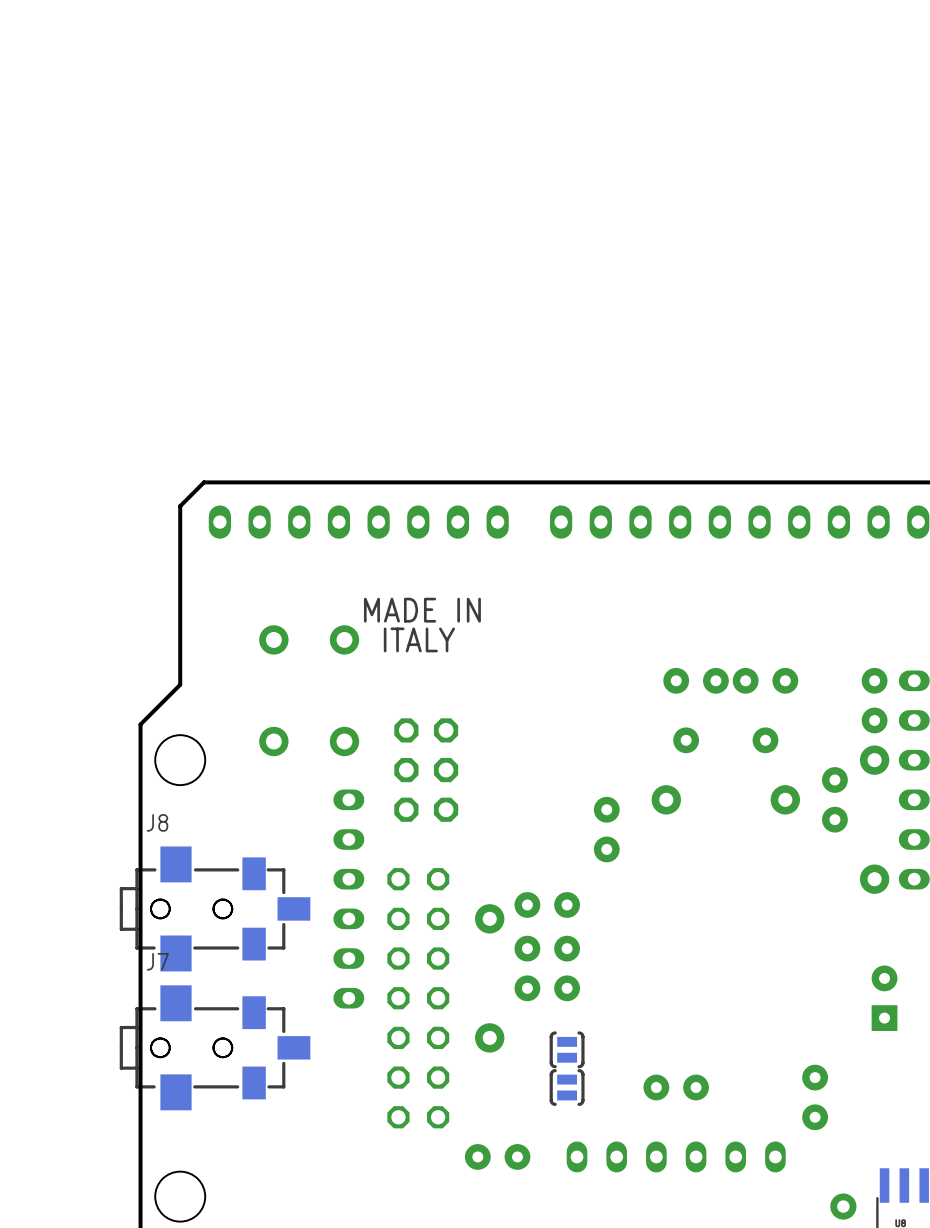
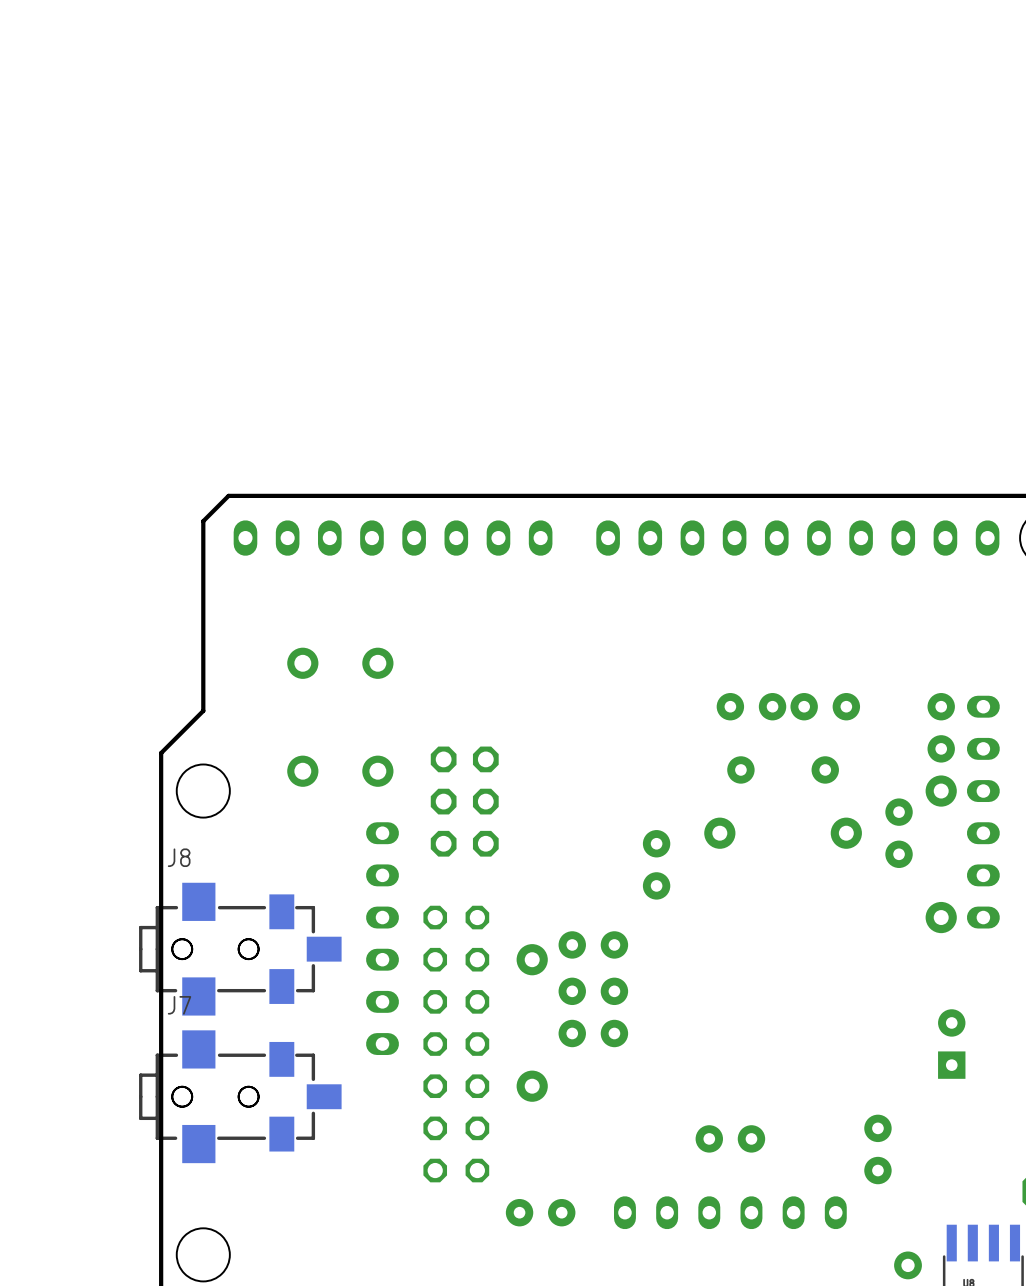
text: MADE IN (422, 610) -> none
text: ITALY (419, 639) -> none
part: (567, 1049) -> none
part: (567, 1087) -> none

